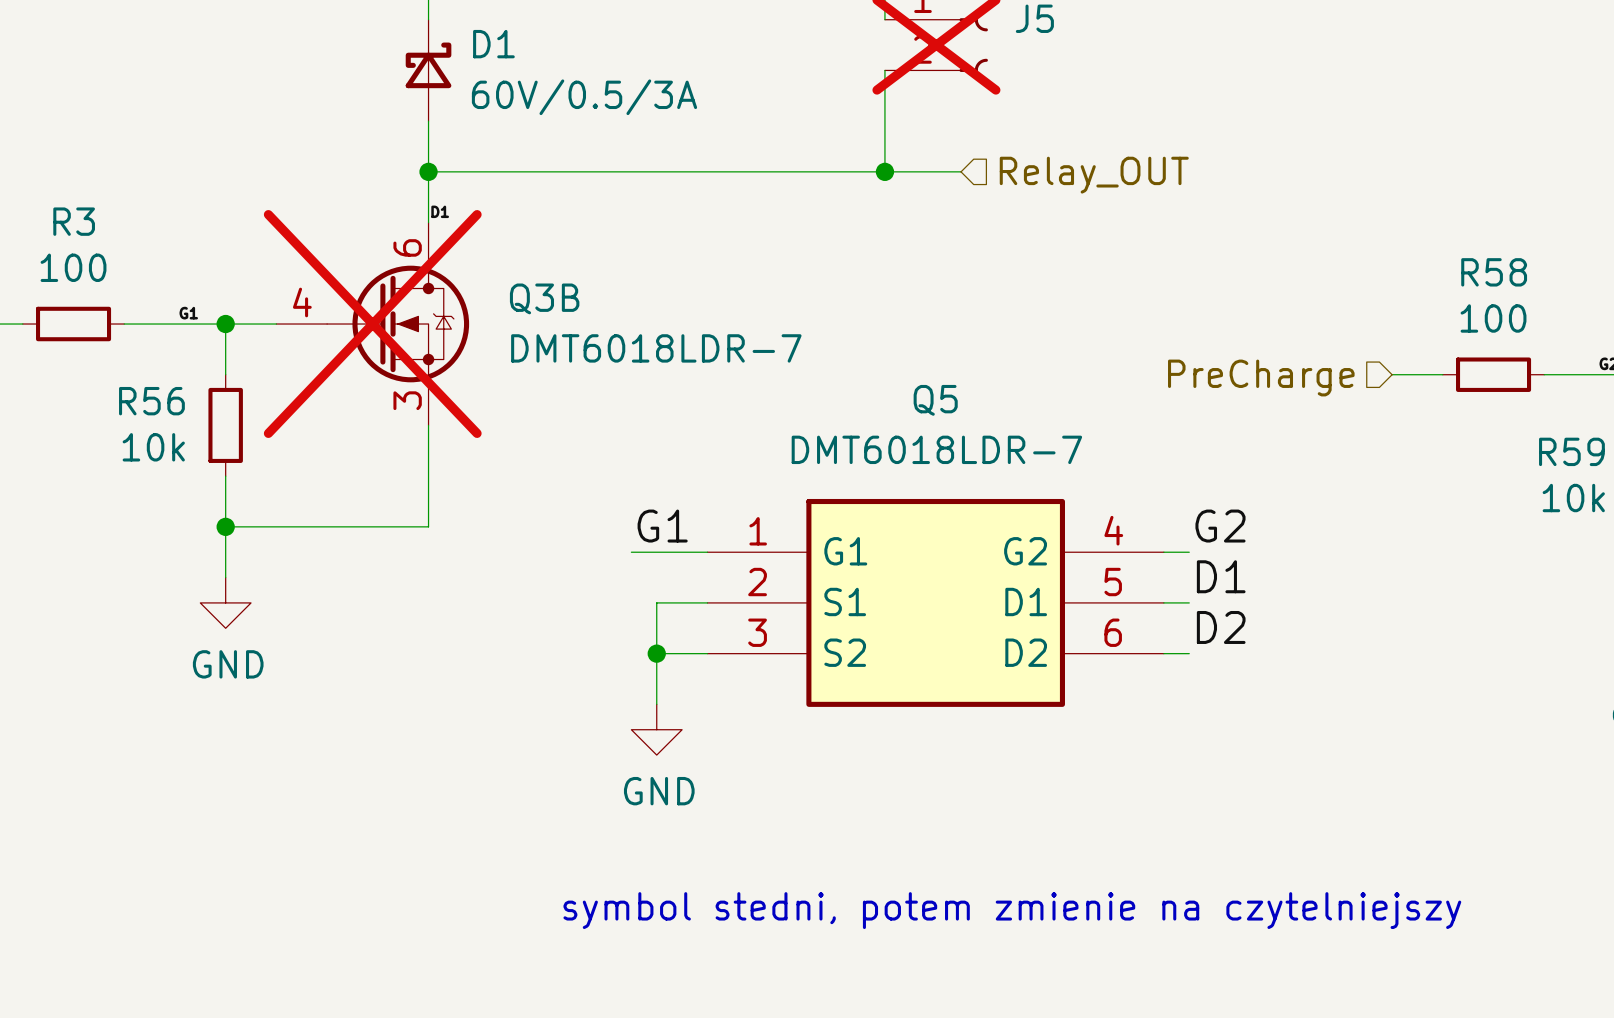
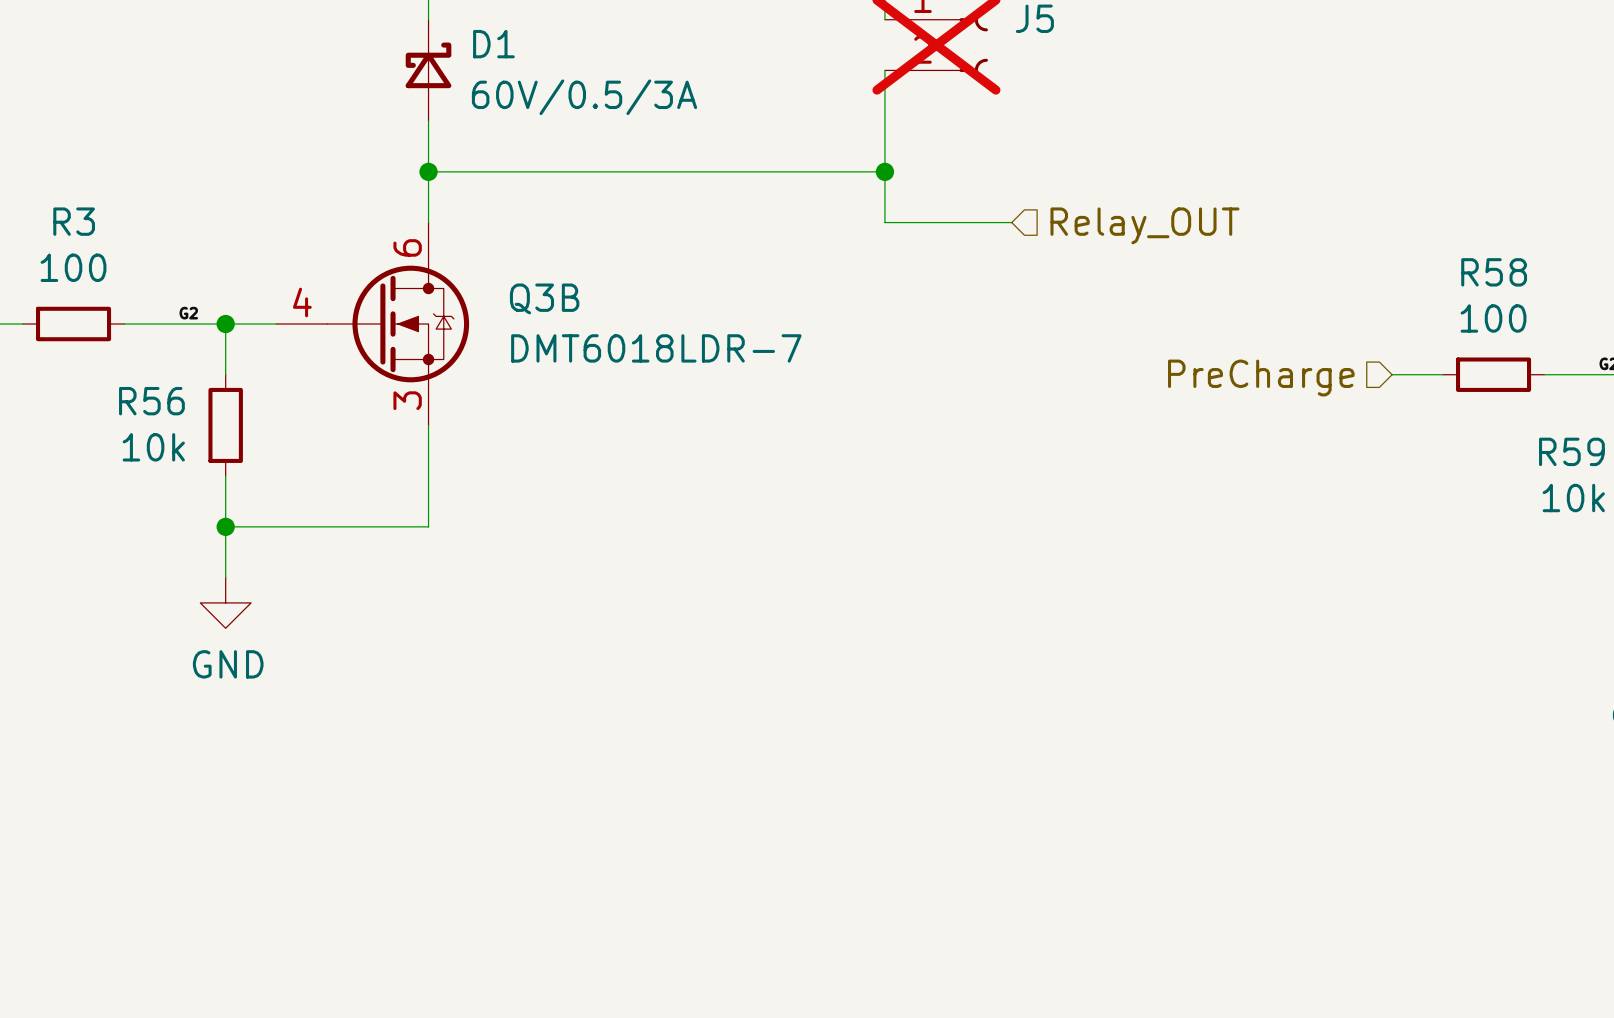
wire: (884, 171) (961, 171) -> (884, 171) (884, 222) (1011, 222)
hierarchical label position: Relay_OUT (1094, 175) -> Relay_OUT (1144, 225)
label: D1 (440, 211) -> none
label: G1 (188, 313) -> G2 (188, 313)
Q3B do-not-place cross: (372, 324) -> none
label: G1 (662, 526) -> none
label: G2 (1220, 526) -> none
wire: (631, 552) (707, 552) -> none
wire: (1163, 552) (1189, 552) -> none
label: D1 (1221, 576) -> none
wire: (707, 602) (656, 602) (656, 704) -> none
Q5: DMT6018LDR-7 (935, 602) -> none
wire: (1163, 602) (1189, 602) -> none
label: D2 (1221, 627) -> none
wire: (656, 653) (707, 653) -> none
junction: (656, 653) -> none
wire: (1163, 653) (1189, 653) -> none
power symbol: GND (656, 729) -> none
text: symbol stedni, potem zmienie na czytelniejszy (1012, 910) -> none

